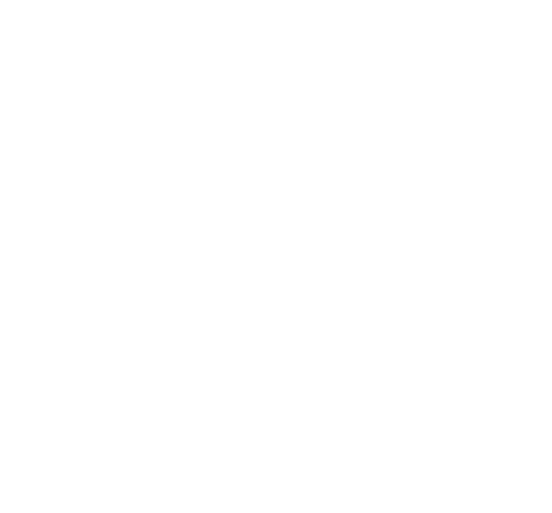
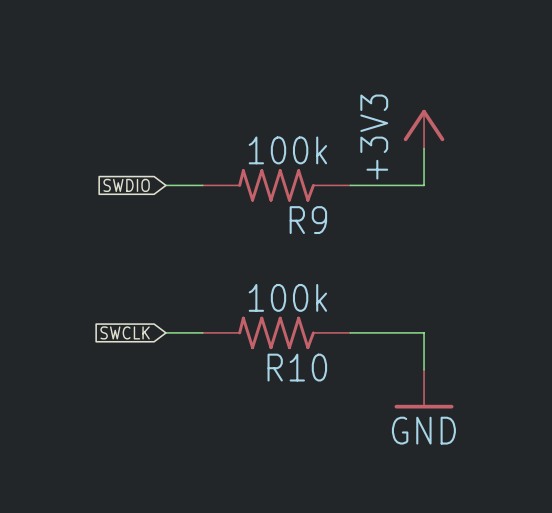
power symbol: none -> +3V3 (424, 129)
wire: none -> (424, 148) (424, 185) (350, 185)
global label: none -> SWDIO (126, 185)
wire: none -> (165, 185) (202, 185)
R9: none -> 100k (276, 185)
global label: none -> SWCLK (125, 332)
wire: none -> (165, 332) (202, 332)
R10: none -> 100k (276, 332)
wire: none -> (350, 332) (424, 332) (424, 369)
power symbol: none -> GND (424, 389)

